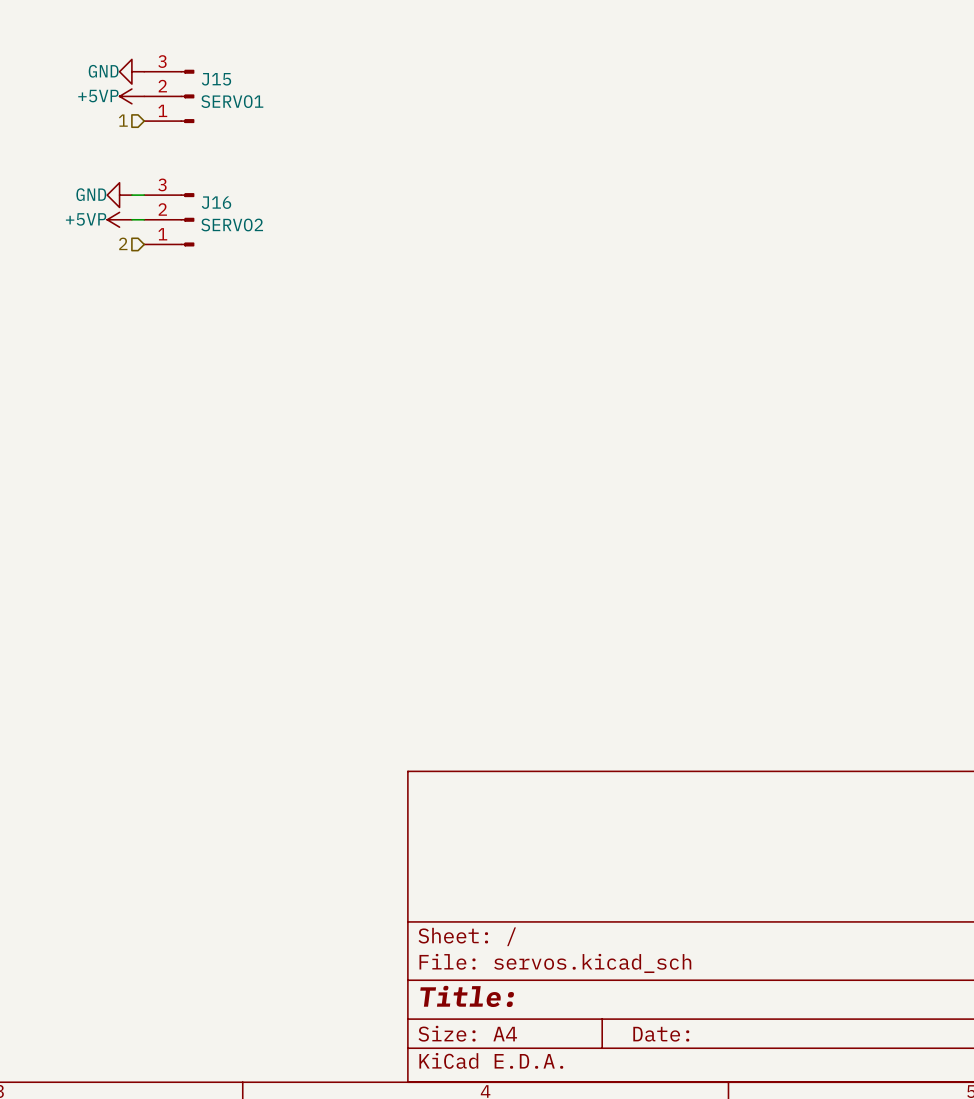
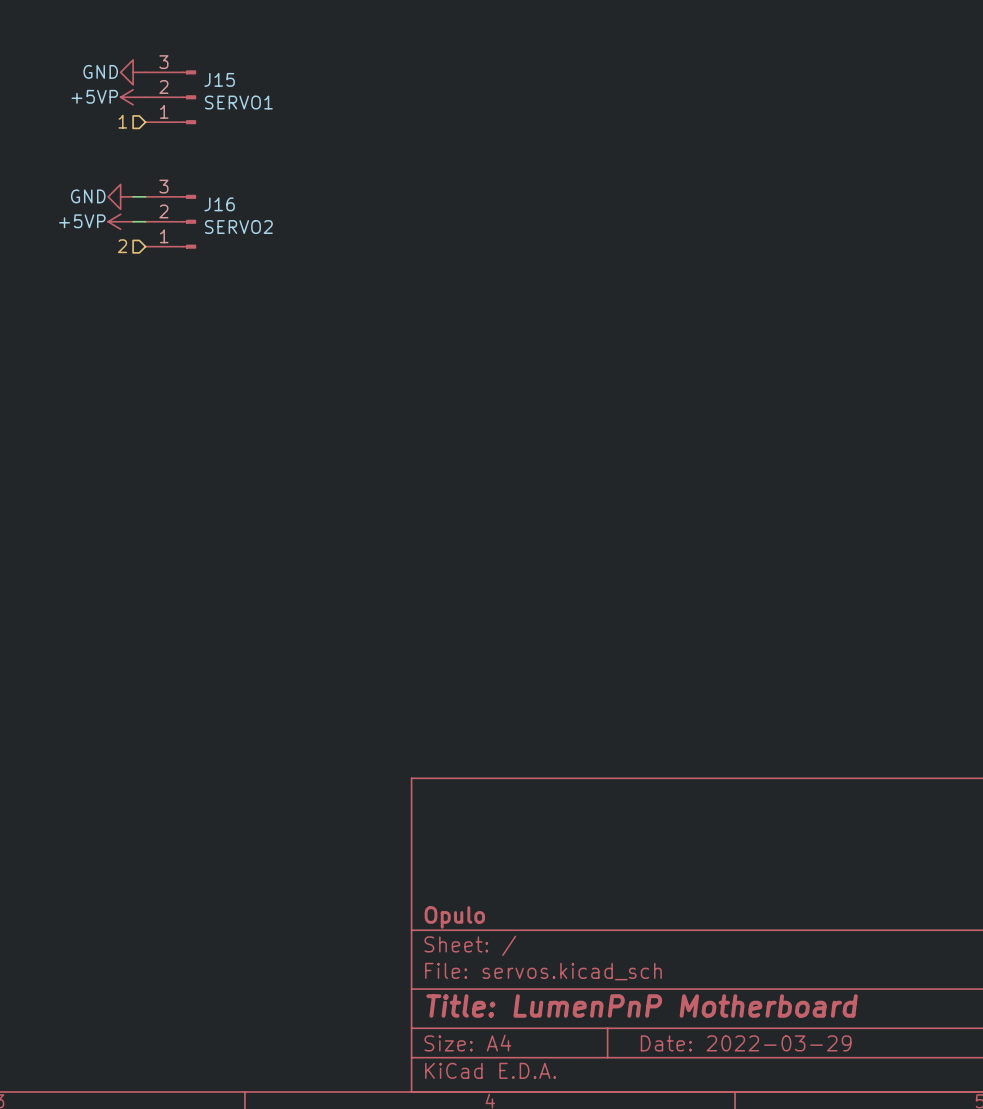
title block: none -> Opulo (454, 917)
title block: Title: (467, 996) -> Title: LumenPnP Motherboard (642, 1005)
title block: Date: (661, 1034) -> Date: 2022-03-29 (746, 1043)

